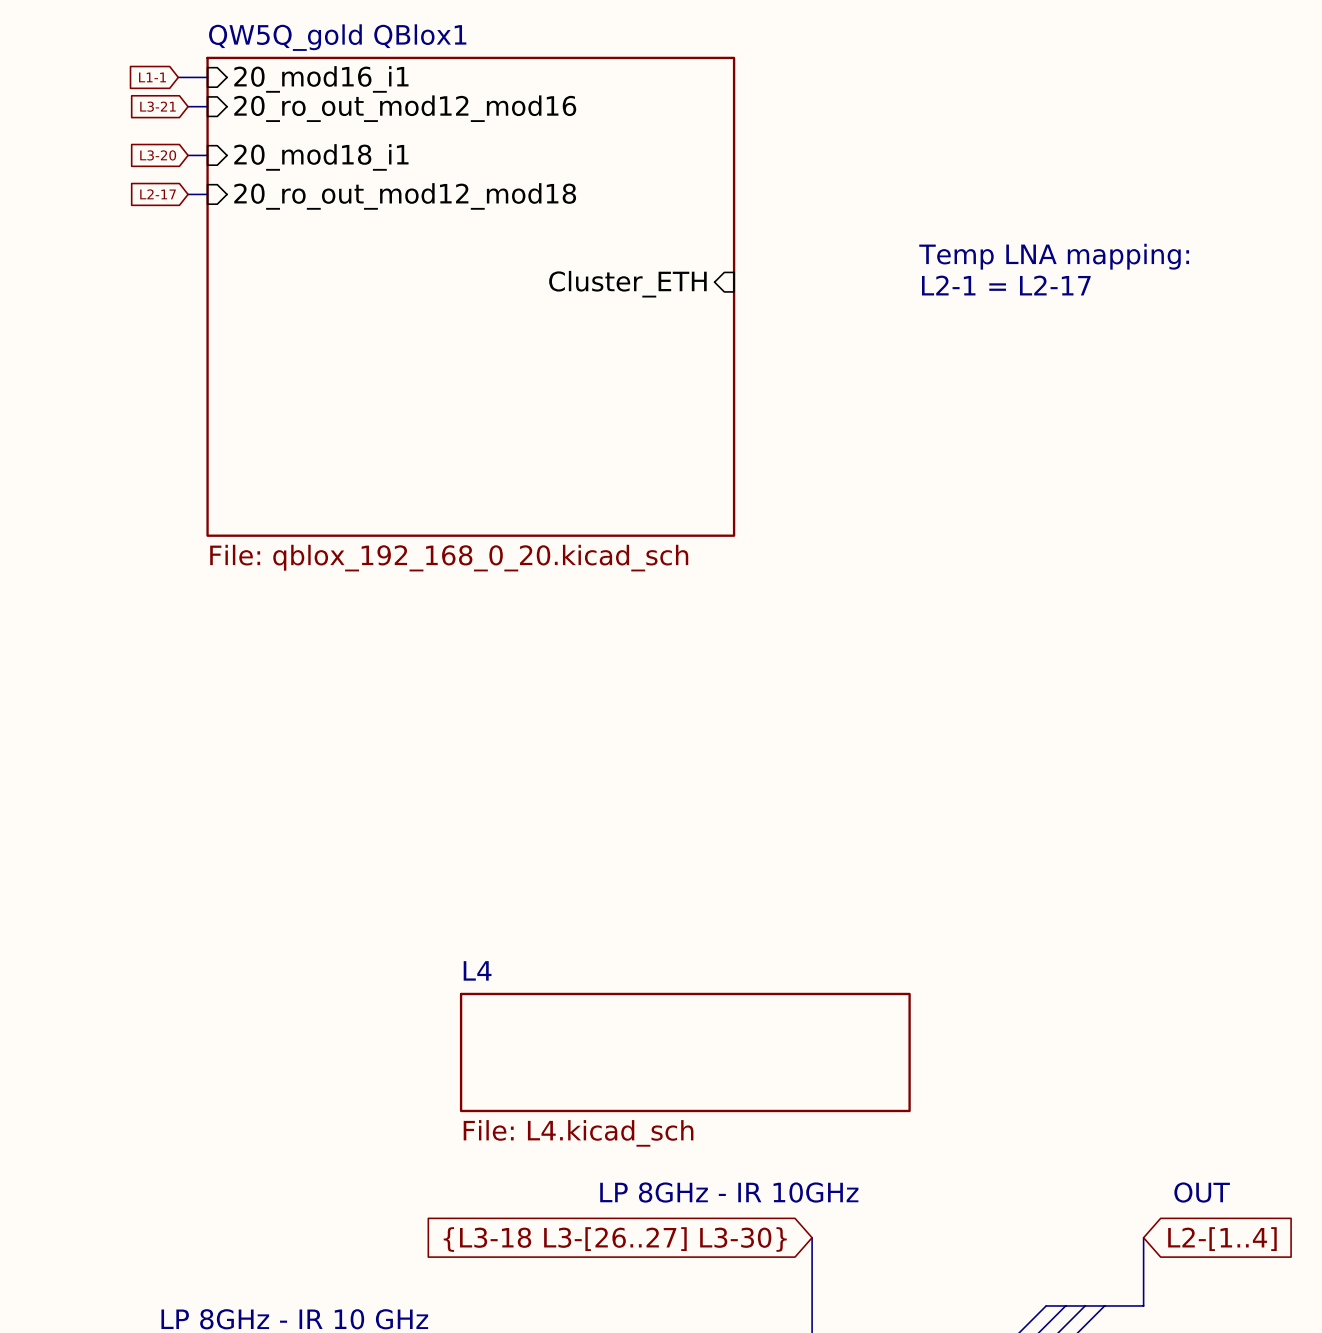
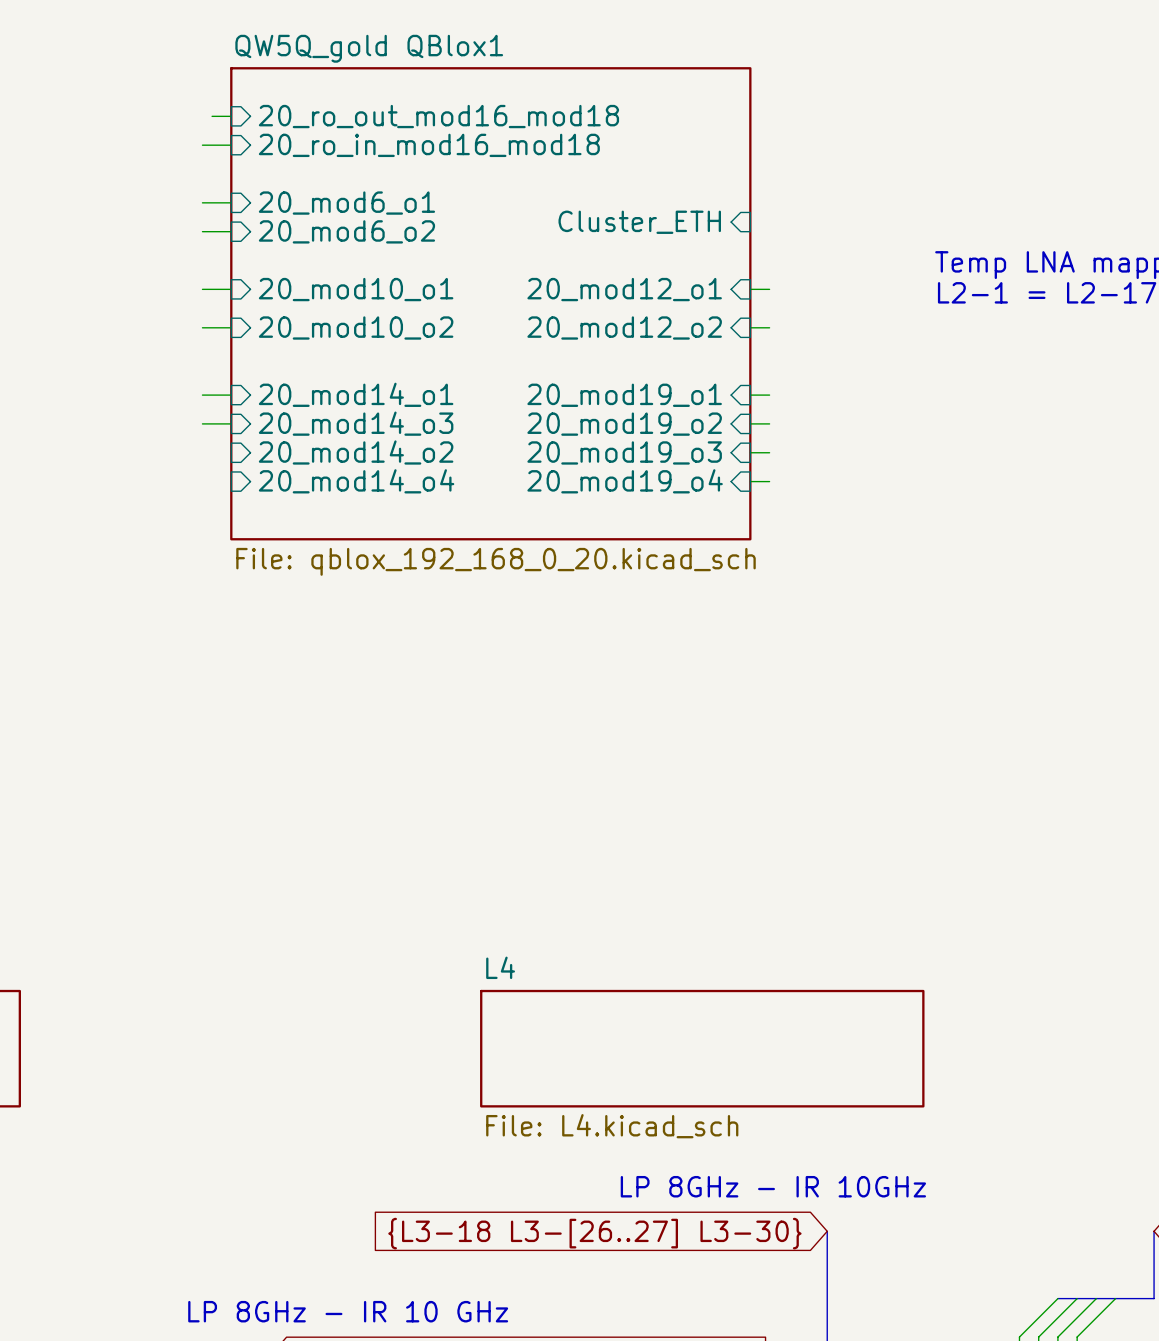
global label: L1-1 (152, 77) -> none
wire: (178, 77) (207, 77) -> (202, 145) (231, 145)
sheet pin: 20_mod16_i1 (321, 79) -> none
global label: L3-21 (157, 106) -> none
sheet pin: 20_ro_out_mod12_mod16 (405, 108) -> 20_ro_out_mod16_mod18 (438, 116)
sheet pin: none -> 20_ro_in_mod16_mod18 (429, 145)
global label: L3-20 (158, 155) -> none
wire: (188, 155) (207, 155) -> none
sheet pin: 20_mod18_i1 (321, 157) -> none
global label: L2-17 (158, 194) -> none
wire: none -> (202, 202) (212, 202)
sheet pin: 20_ro_out_mod12_mod18 (405, 196) -> 20_mod6_o1 (346, 203)
sheet pin: none -> Cluster_ETH (639, 222)
wire: none -> (202, 231) (231, 231)
sheet pin: none -> 20_mod6_o2 (346, 231)
wire: none -> (202, 289) (231, 289)
wire: none -> (750, 289) (769, 289)
sheet pin: none -> 20_mod10_o1 (356, 289)
sheet pin: Cluster_ETH (627, 284) -> 20_mod12_o1 (624, 289)
wire: none -> (202, 327) (231, 327)
wire: none -> (750, 327) (769, 327)
sheet pin: none -> 20_mod10_o2 (356, 328)
sheet pin: none -> 20_mod12_o2 (624, 328)
wire: none -> (202, 395) (231, 395)
wire: none -> (750, 395) (769, 395)
sheet pin: none -> 20_mod14_o1 (356, 394)
sheet pin: none -> 20_mod19_o1 (624, 395)
wire: none -> (202, 423) (231, 423)
wire: none -> (750, 423) (769, 423)
sheet pin: none -> 20_mod14_o3 (356, 423)
sheet pin: none -> 20_mod19_o2 (624, 424)
wire: none -> (750, 452) (769, 452)
sheet pin: none -> 20_mod14_o2 (356, 452)
sheet pin: none -> 20_mod19_o3 (624, 452)
wire: none -> (750, 481) (769, 481)
sheet pin: none -> 20_mod14_o4 (356, 481)
sheet pin: none -> 20_mod19_o4 (625, 481)

